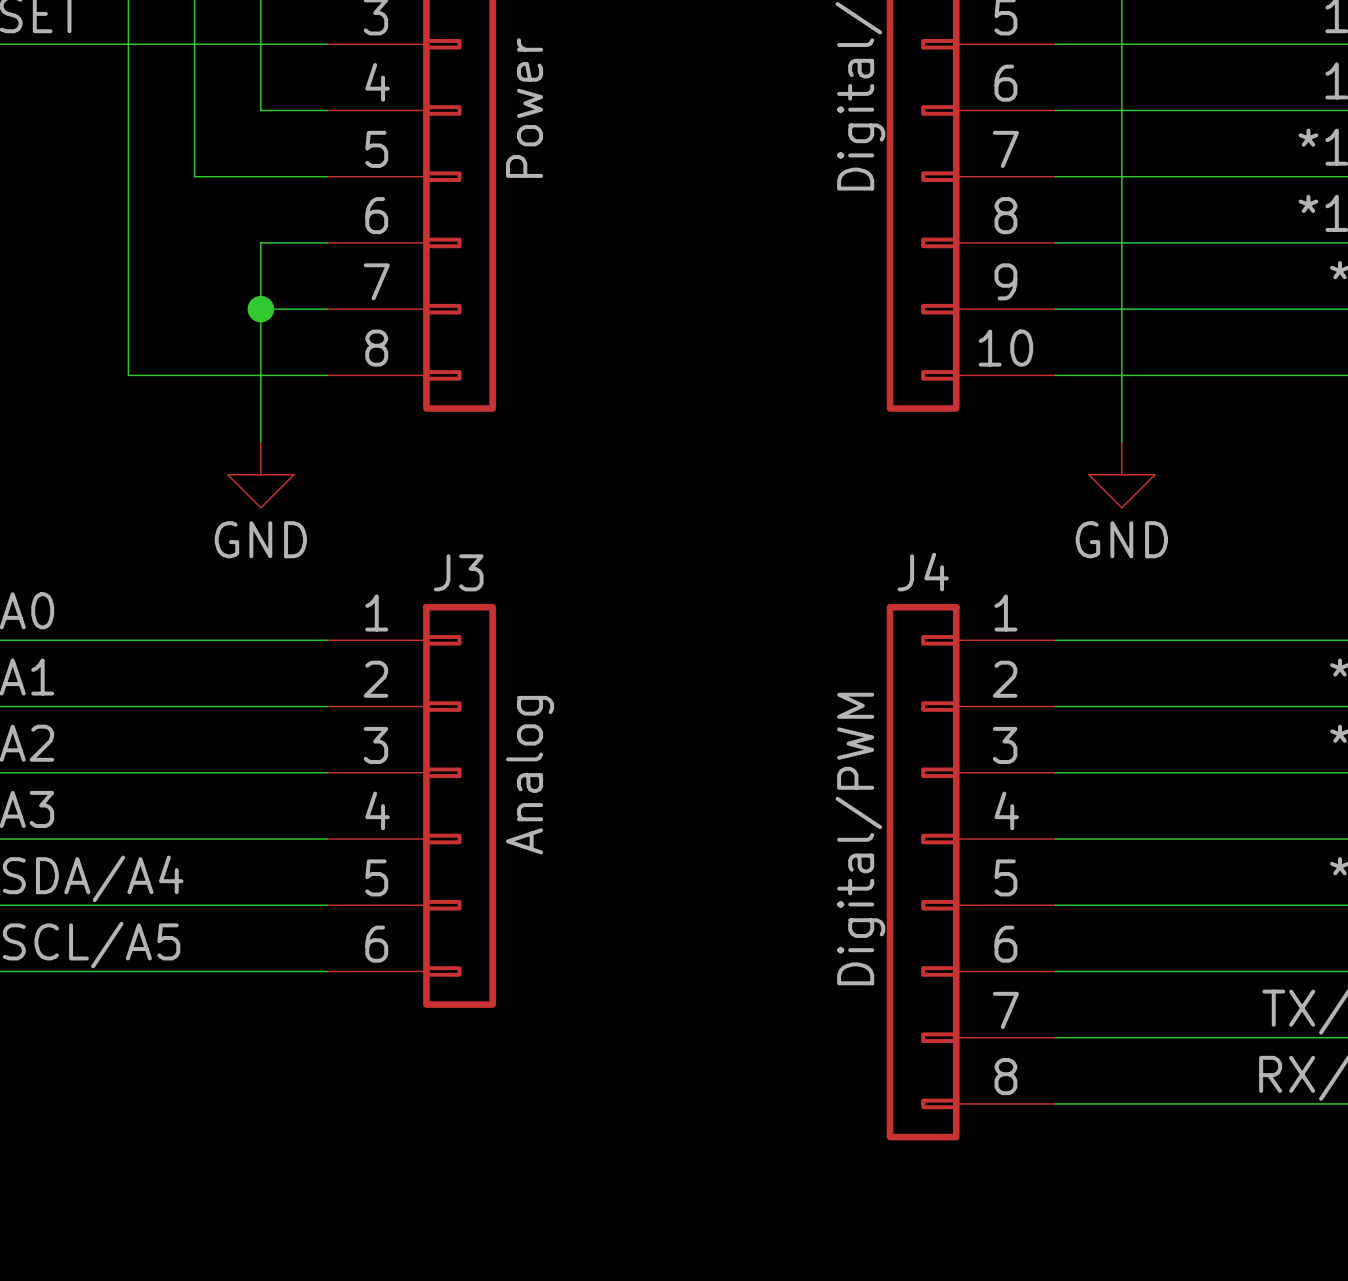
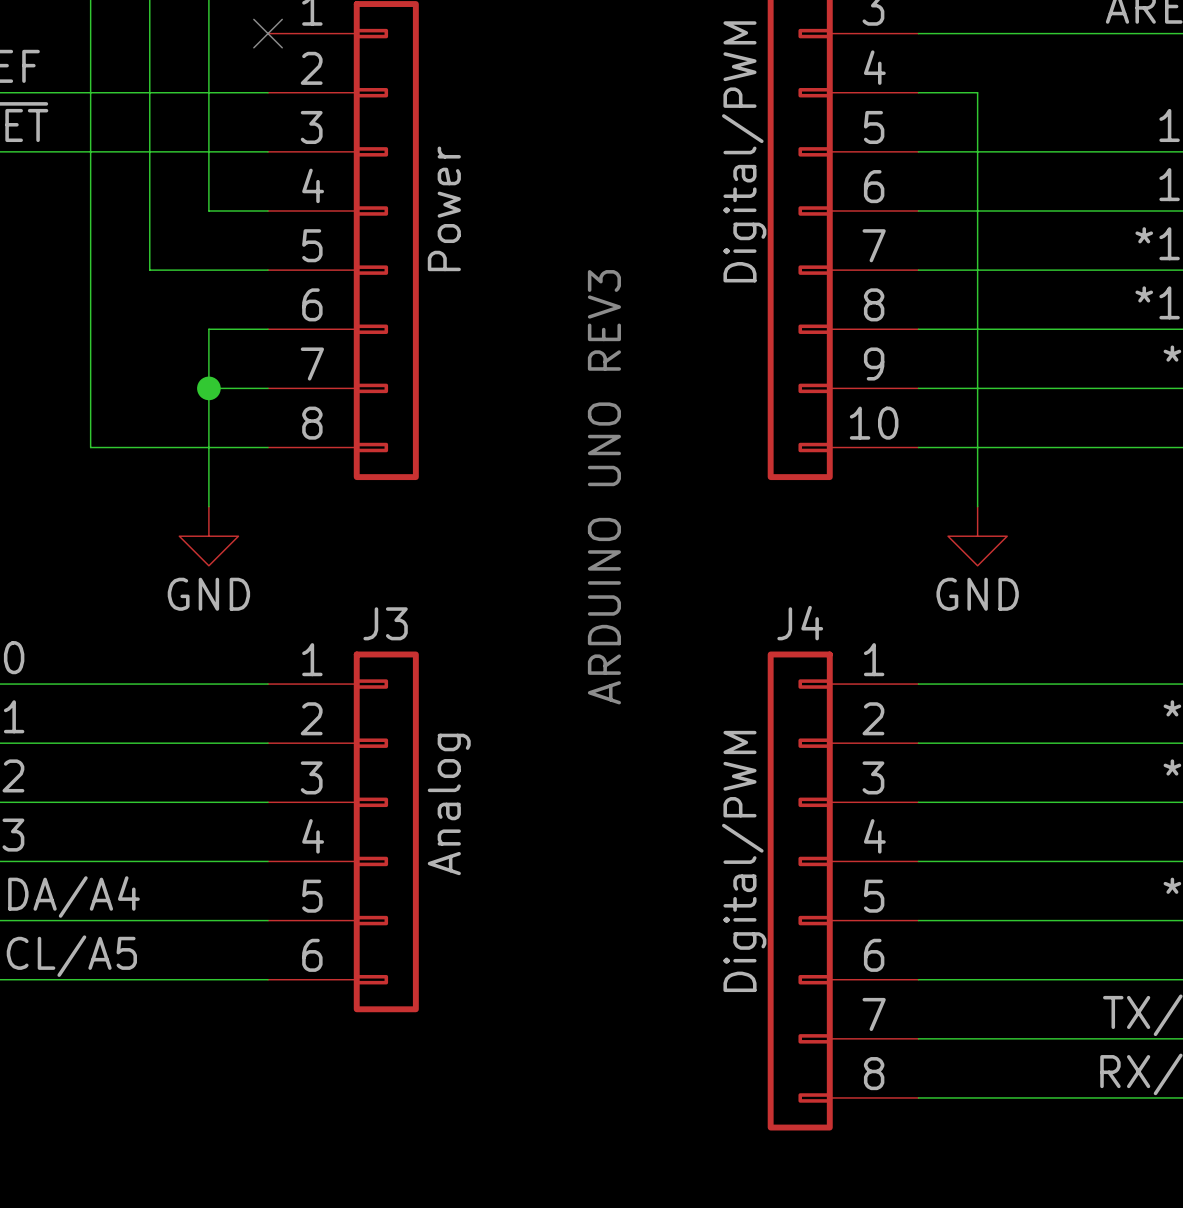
text: none -> ARDUINO UNO REV3 (604, 487)

